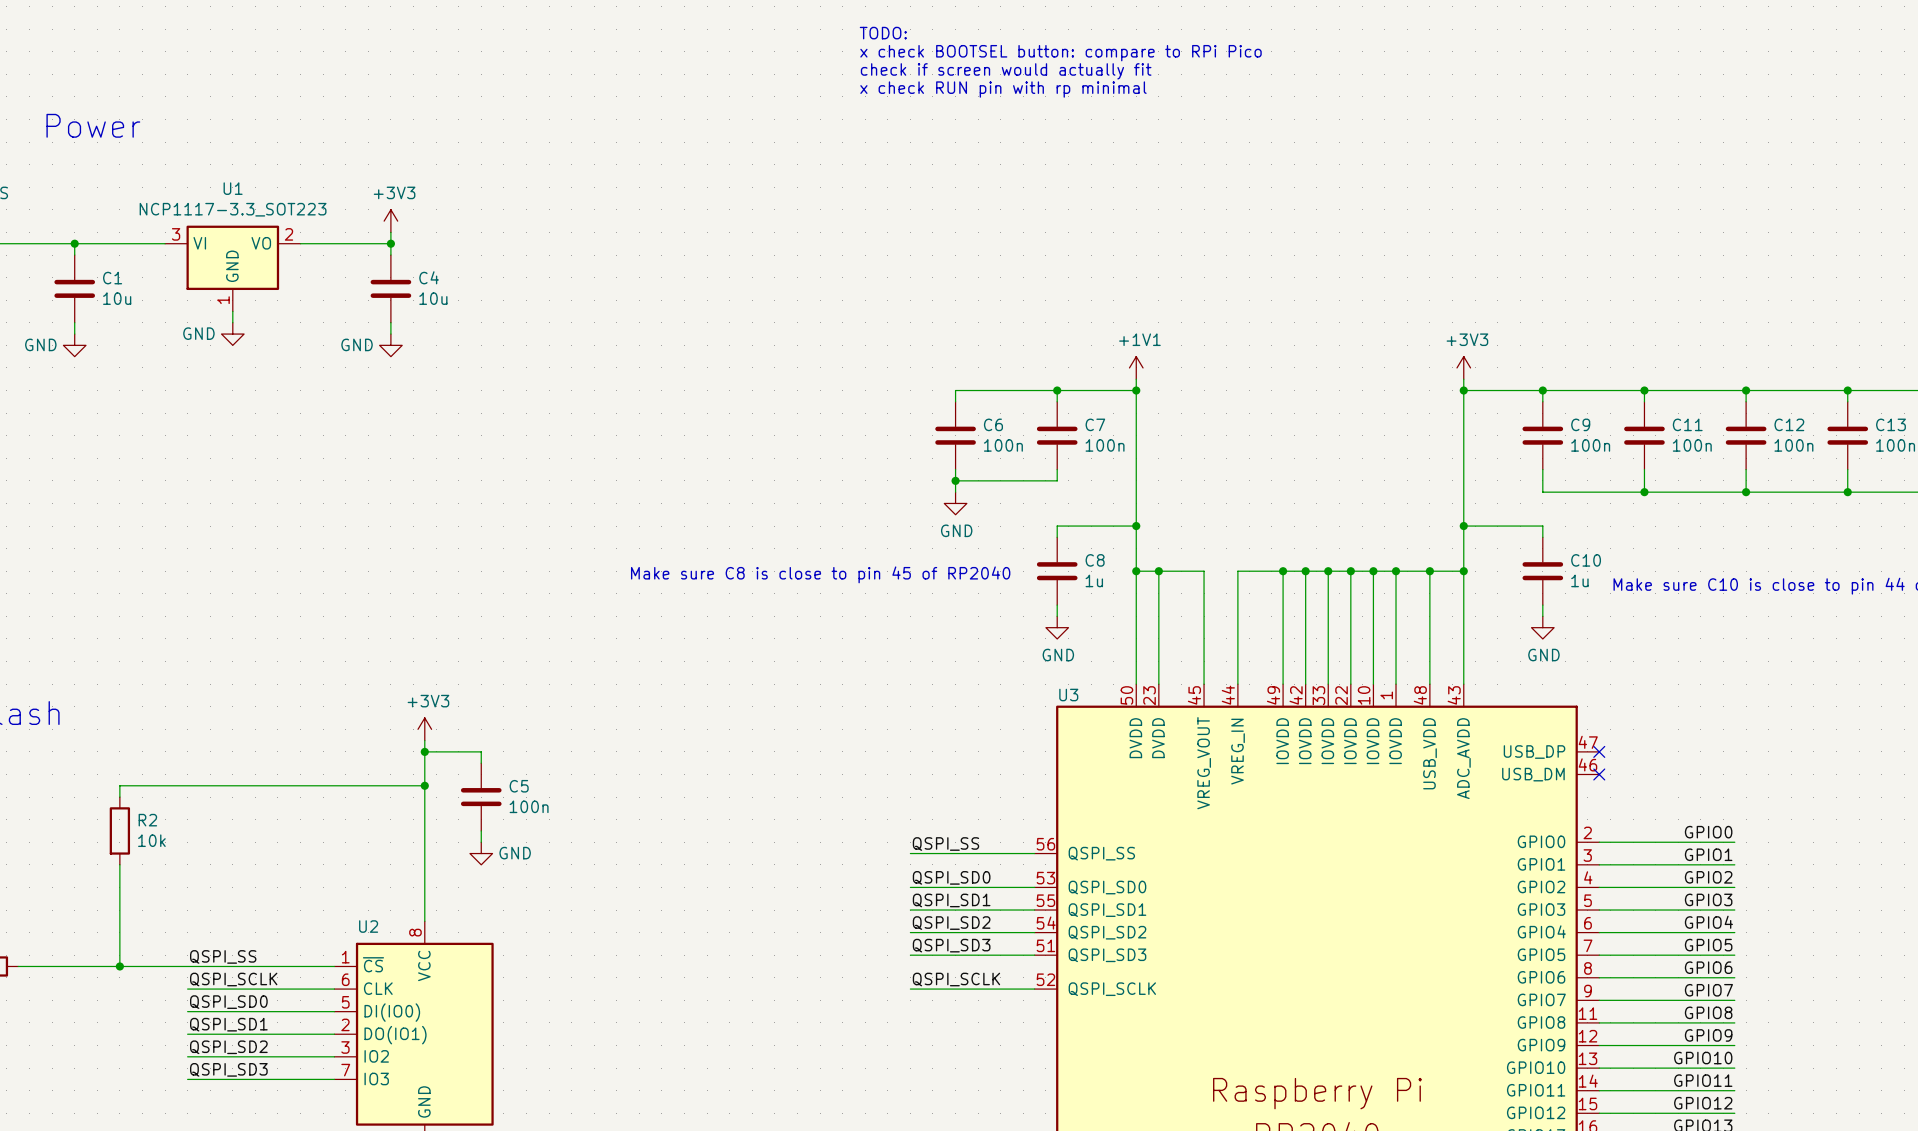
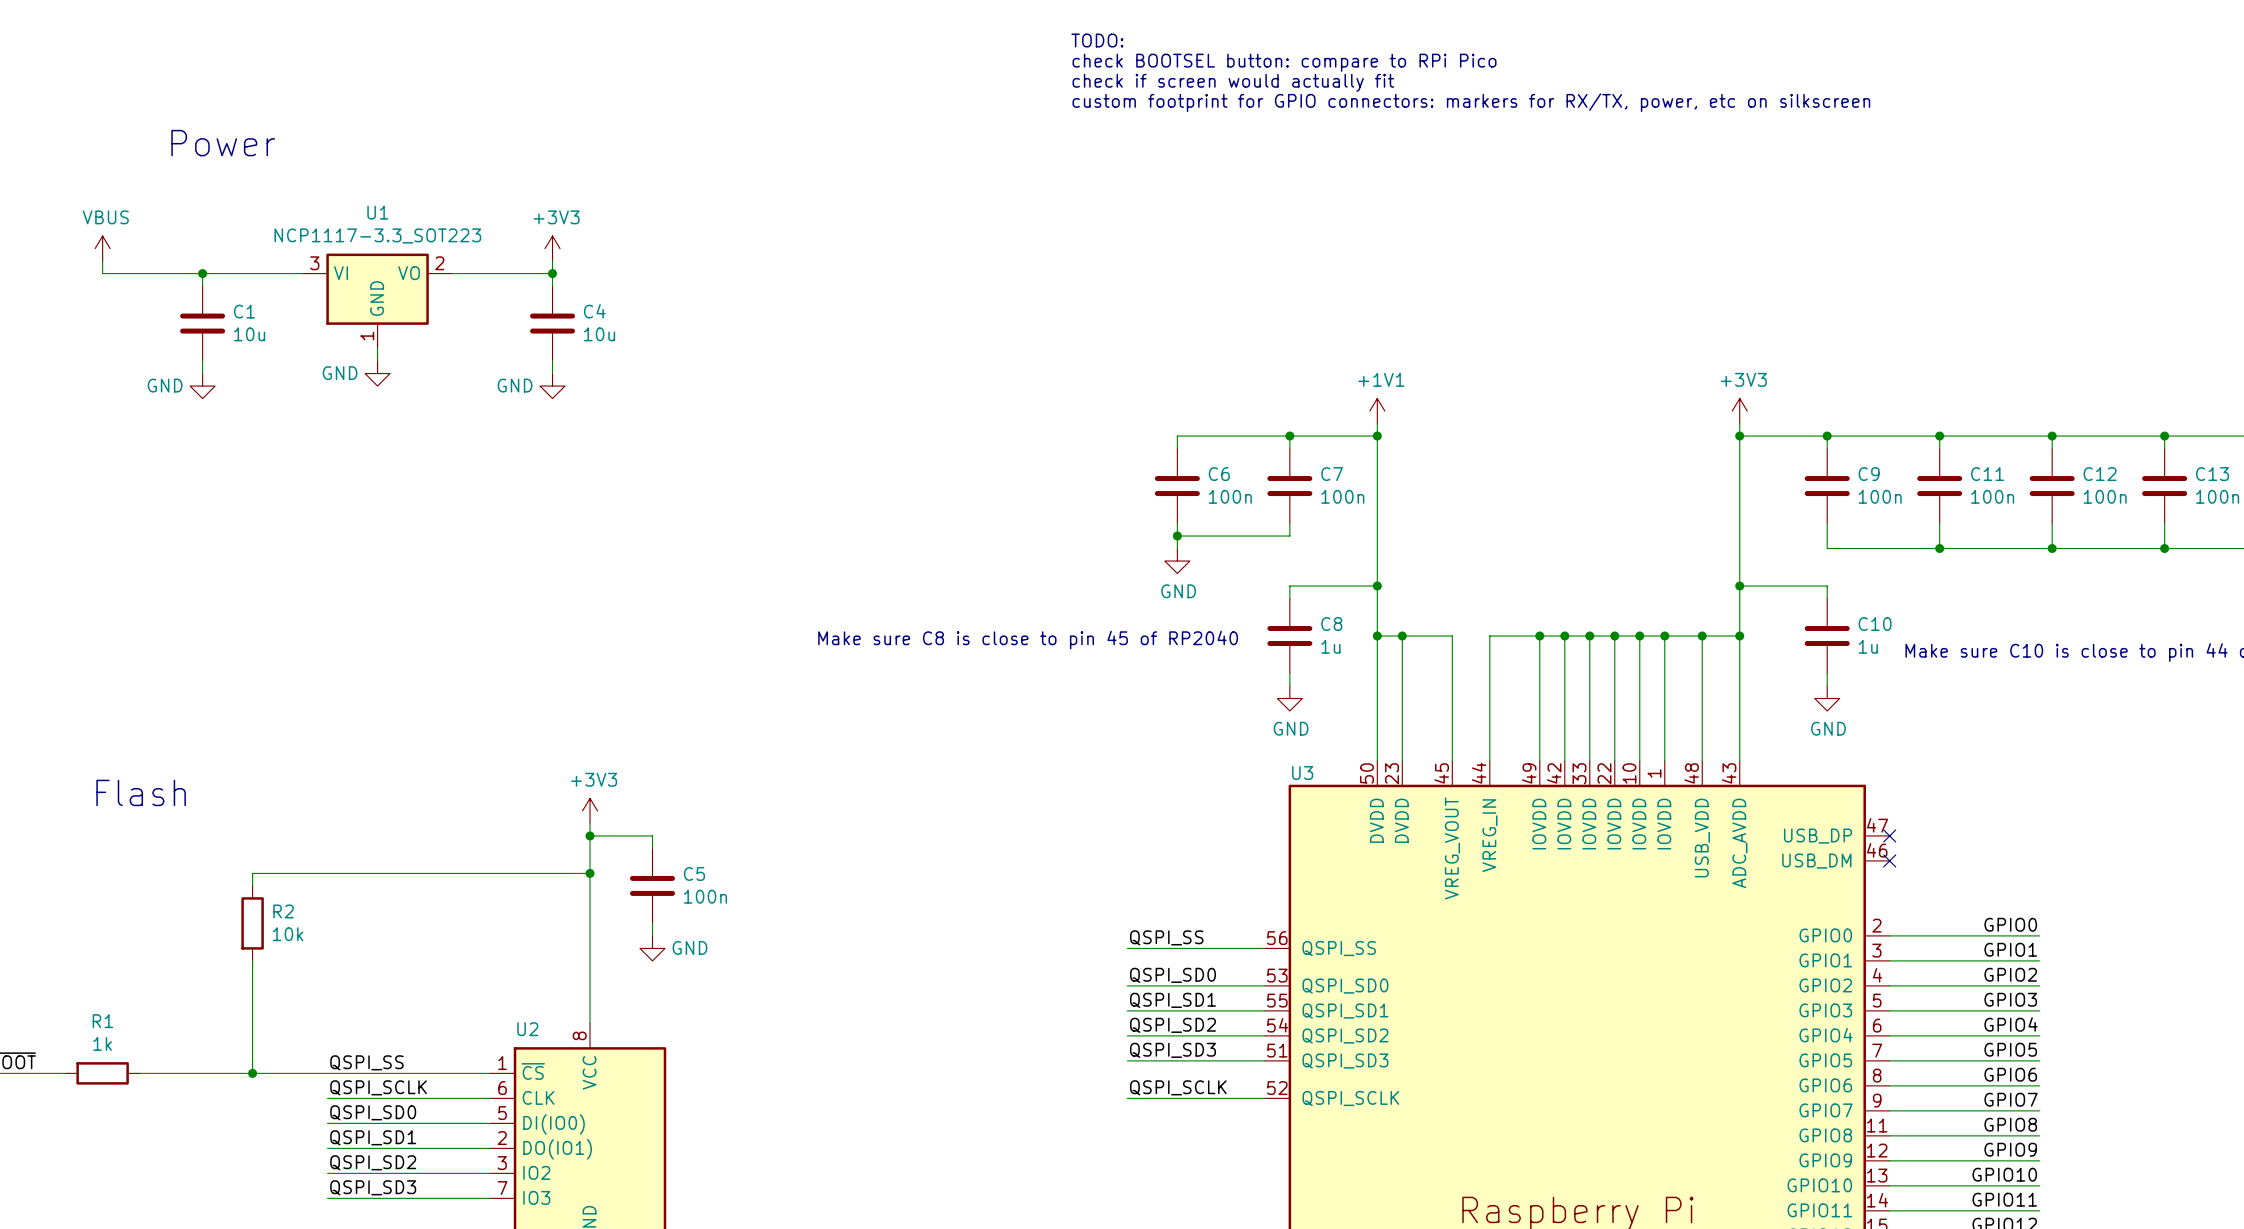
text: x check BOOTSEL button: compare to RPi Pico (1061, 53) -> check BOOTSEL button: compare to RPi Pico (1284, 62)
text: x check RUN pin with rp minimal (1003, 89) -> custom footprint for GPIO connectors: markers for RX/TX, power, etc on silkscreen (1471, 102)

